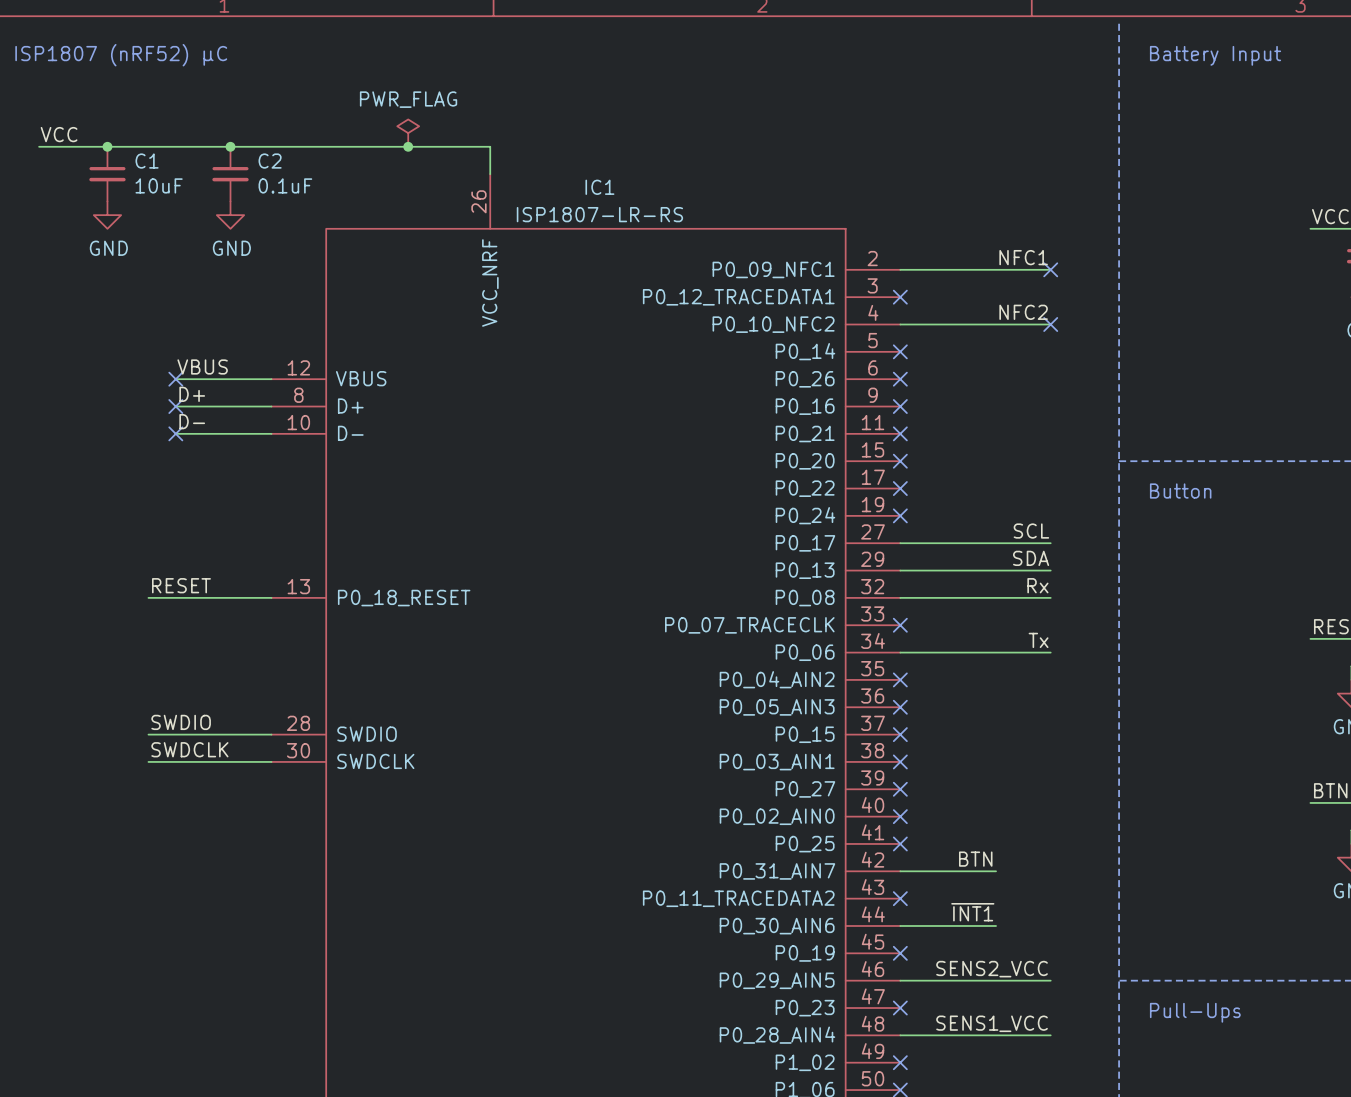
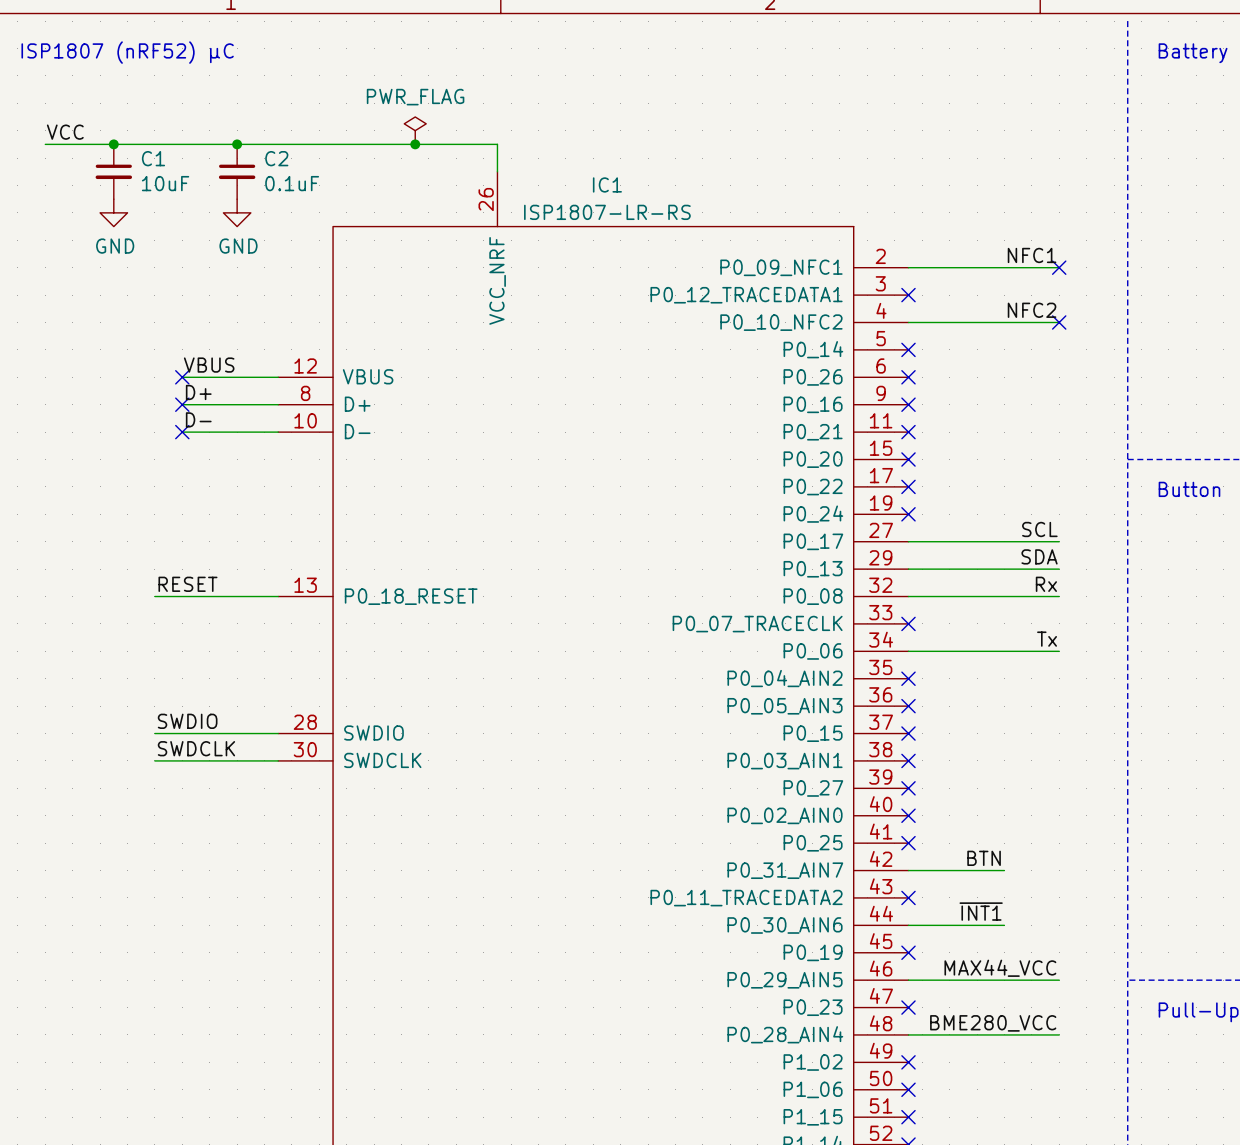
label: SENS2_VCC (992, 969) -> MAX44_VCC (1000, 968)
label: SENS1_VCC (992, 1023) -> BME280_VCC (993, 1023)

